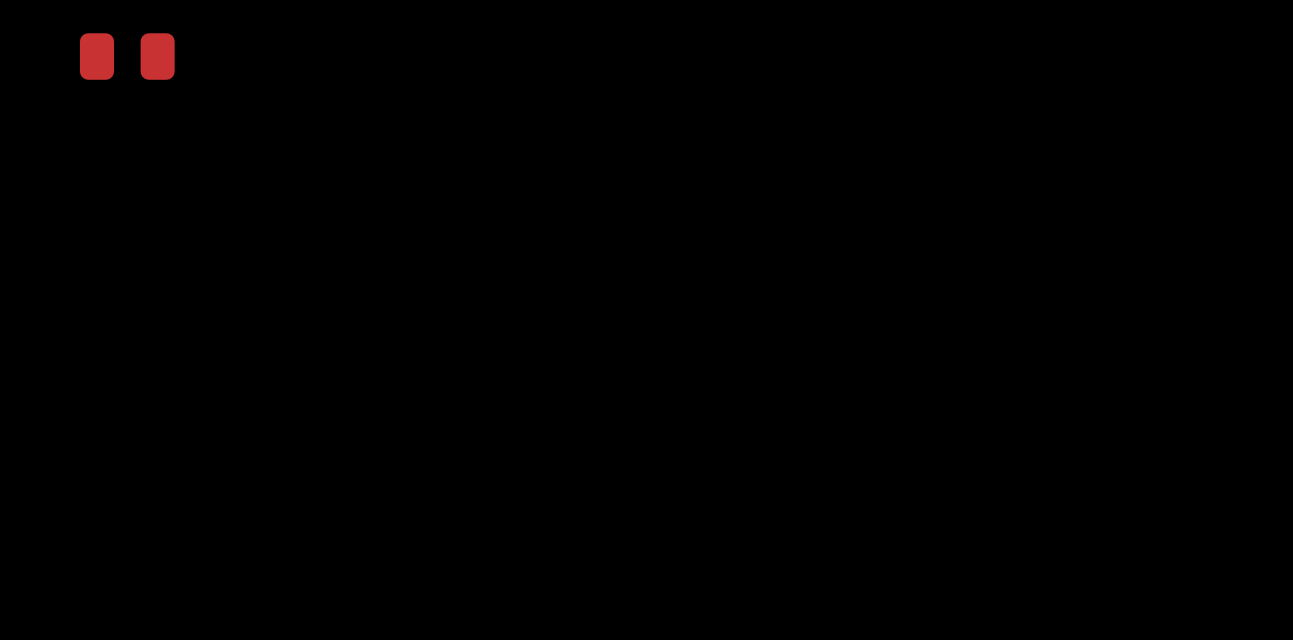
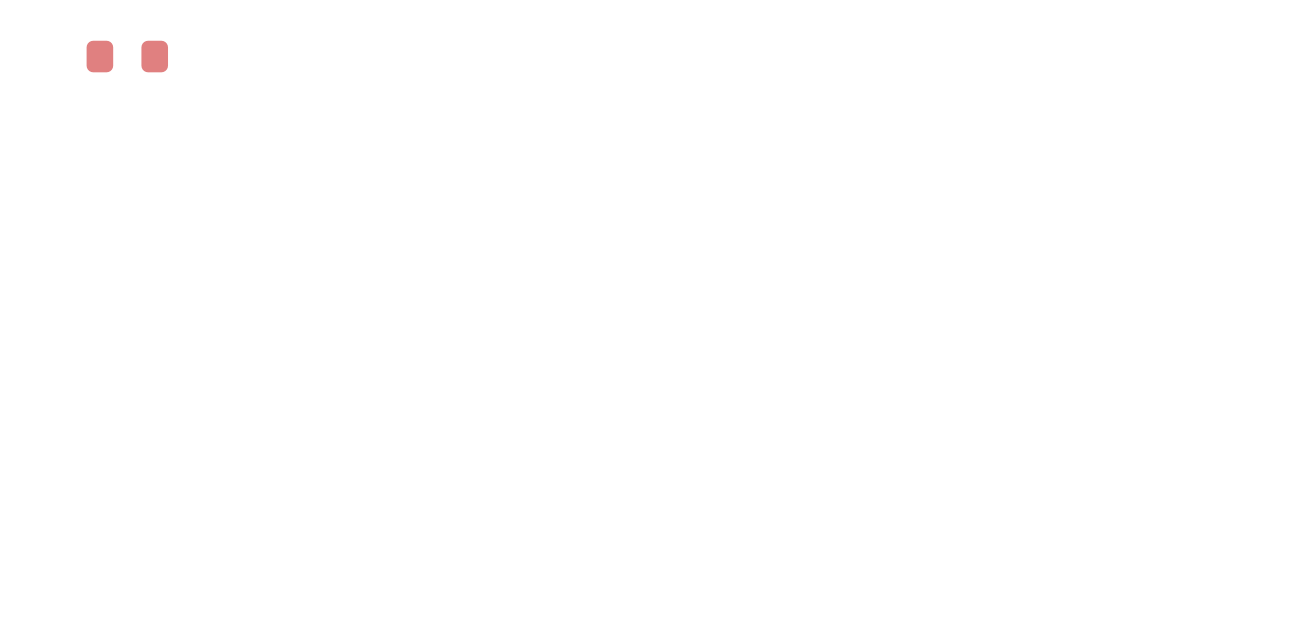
part footprint: [79, 33, 175, 80] -> [86, 40, 169, 73]

